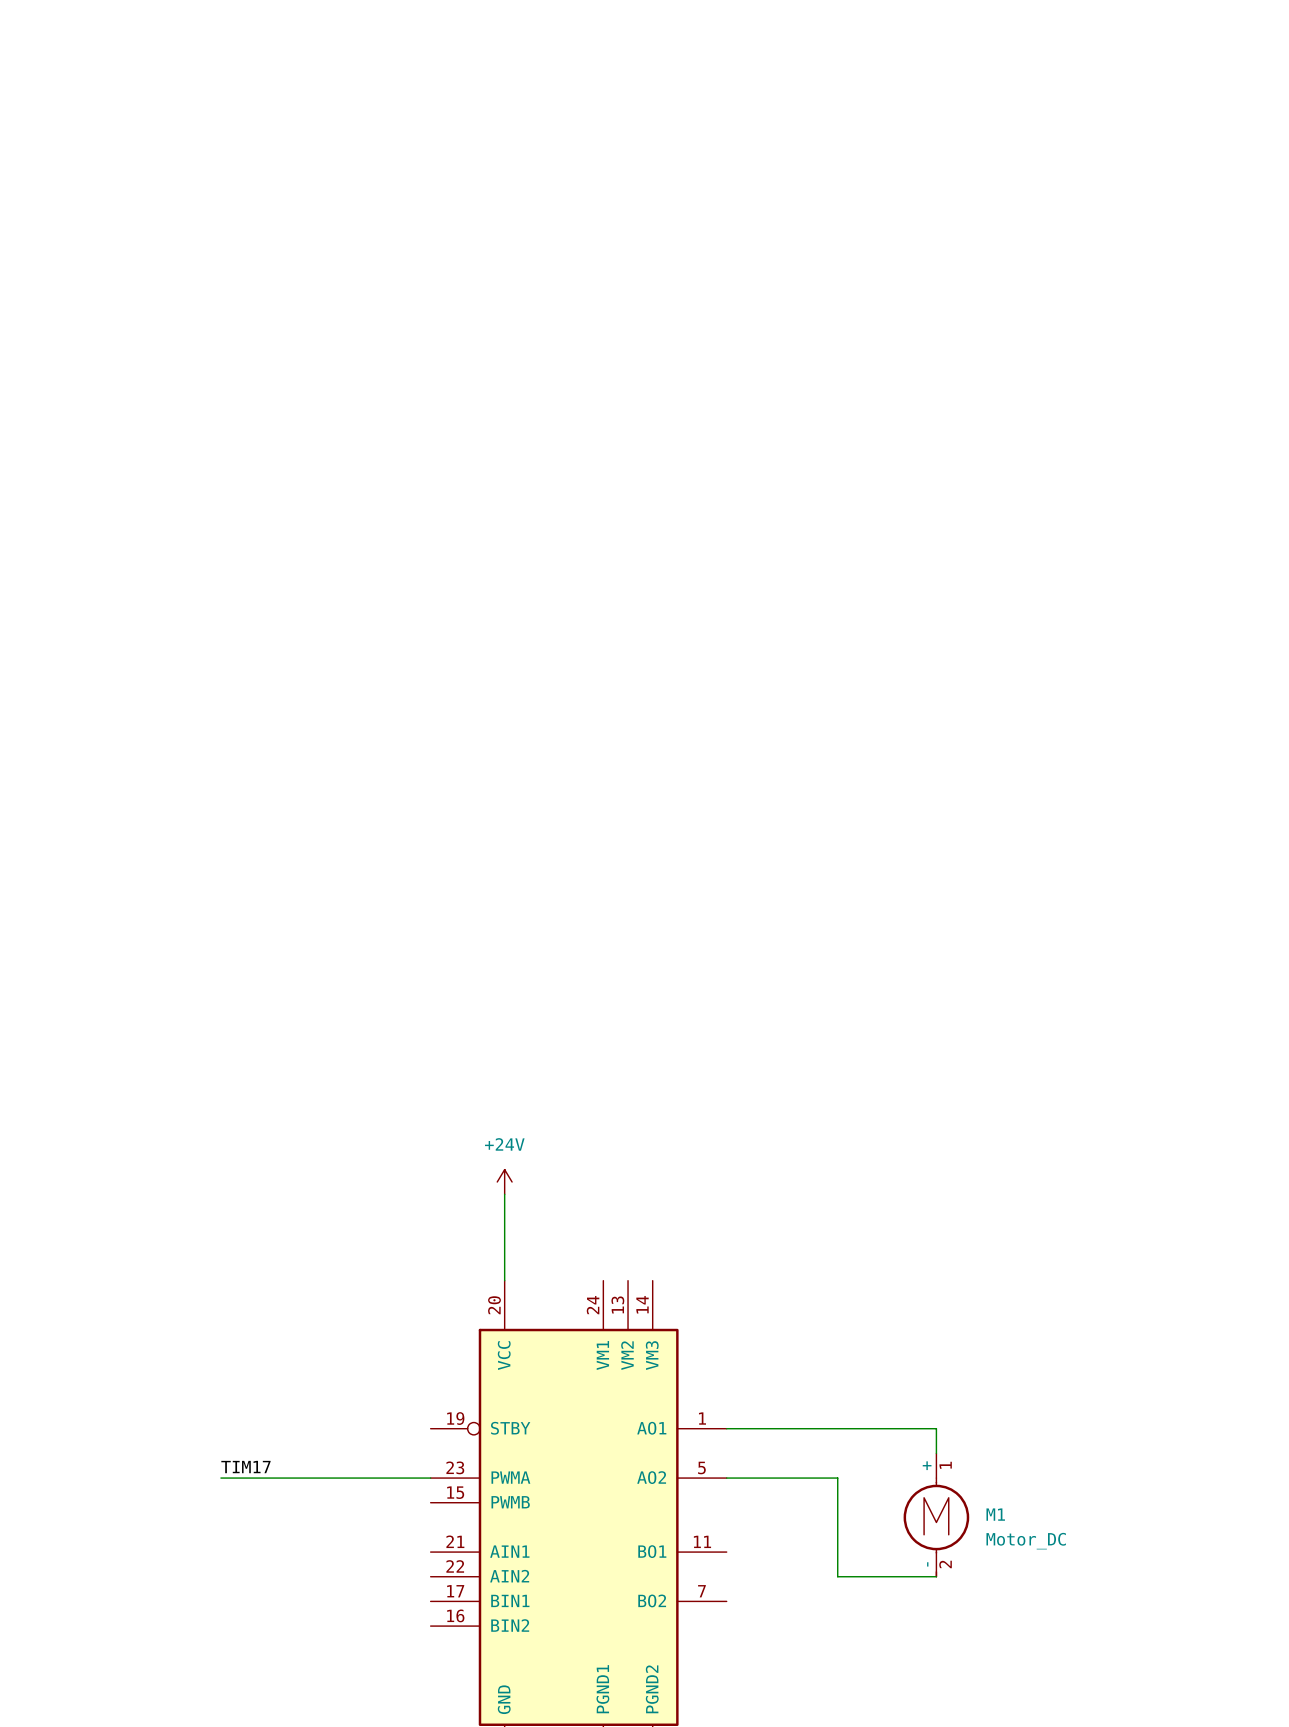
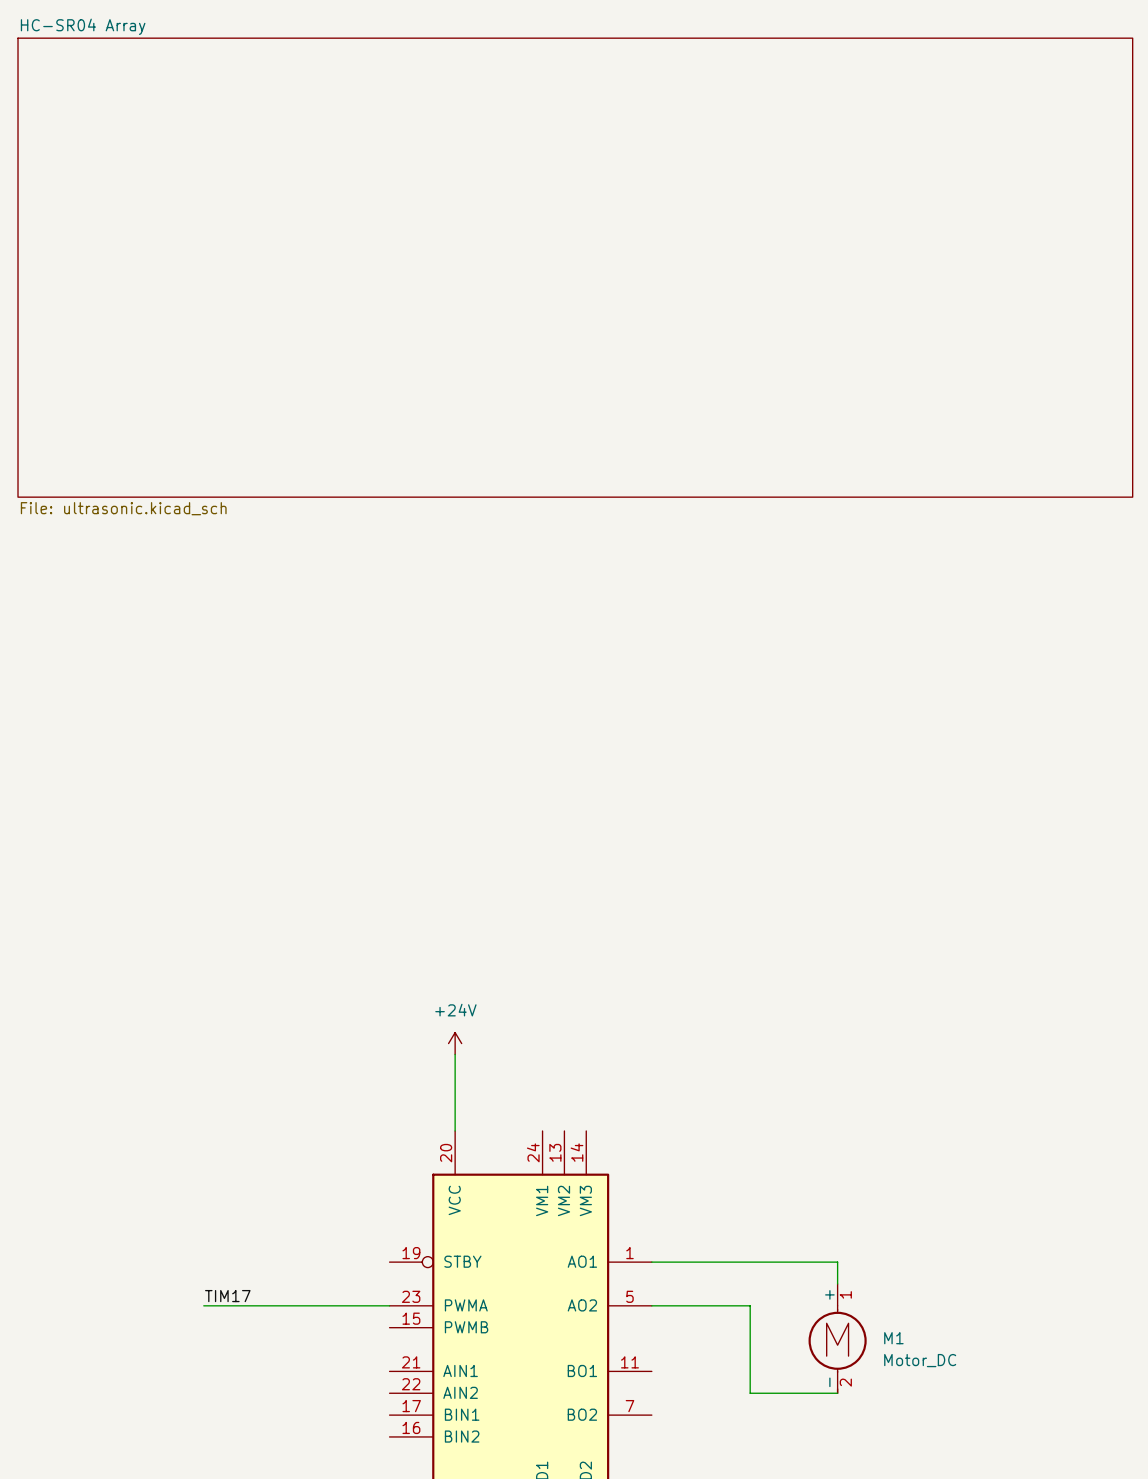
sheet HC-SR04 Array: none -> File: ultrasonic.kicad_sch (575, 267)

